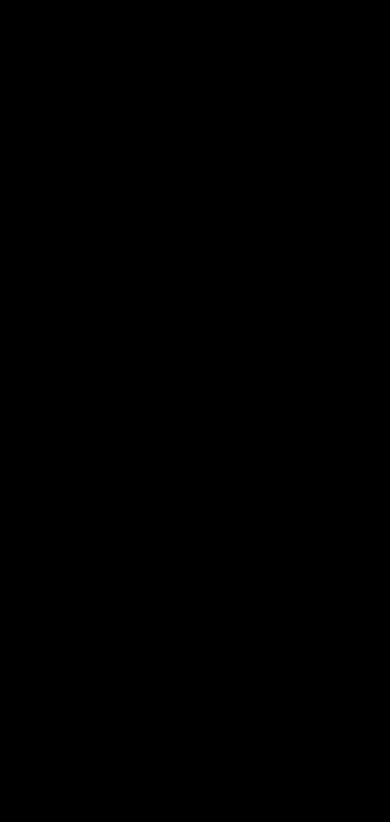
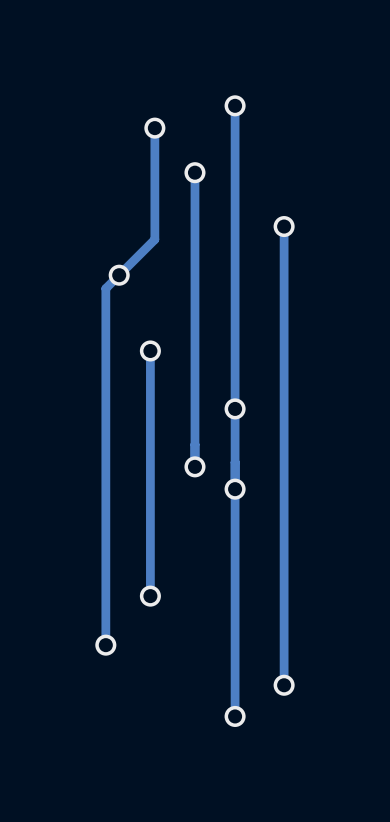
track: none -> (235, 105) (235, 716)
via: none -> (235, 105)
track: none -> (154, 128) (154, 239) (105, 288) (105, 645)
via: none -> (154, 128)
track: none -> (194, 172) (194, 466)
via: none -> (194, 172)
track: none -> (284, 226) (284, 685)
via: none -> (284, 226)
via: none -> (119, 275)
track: none -> (150, 350) (150, 596)
via: none -> (150, 350)
via: none -> (235, 408)
via: none -> (194, 466)
via: none -> (235, 489)
via: none -> (150, 596)
via: none -> (105, 645)
via: none -> (284, 685)
via: none -> (235, 716)

